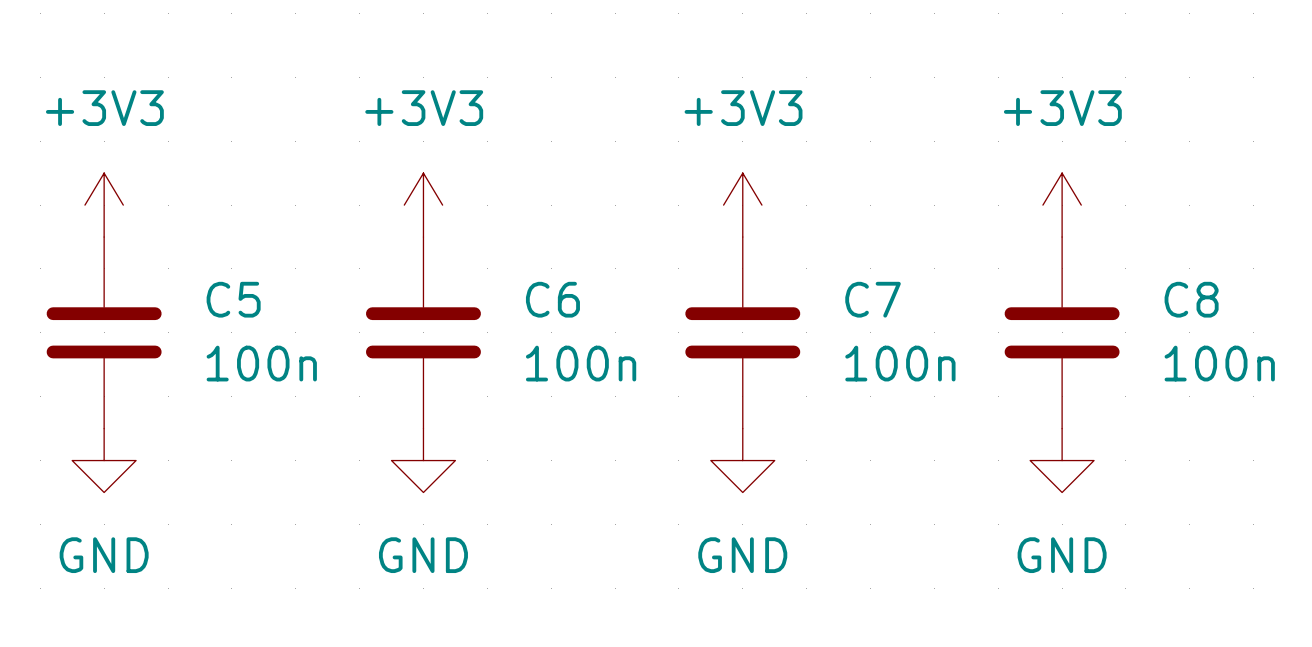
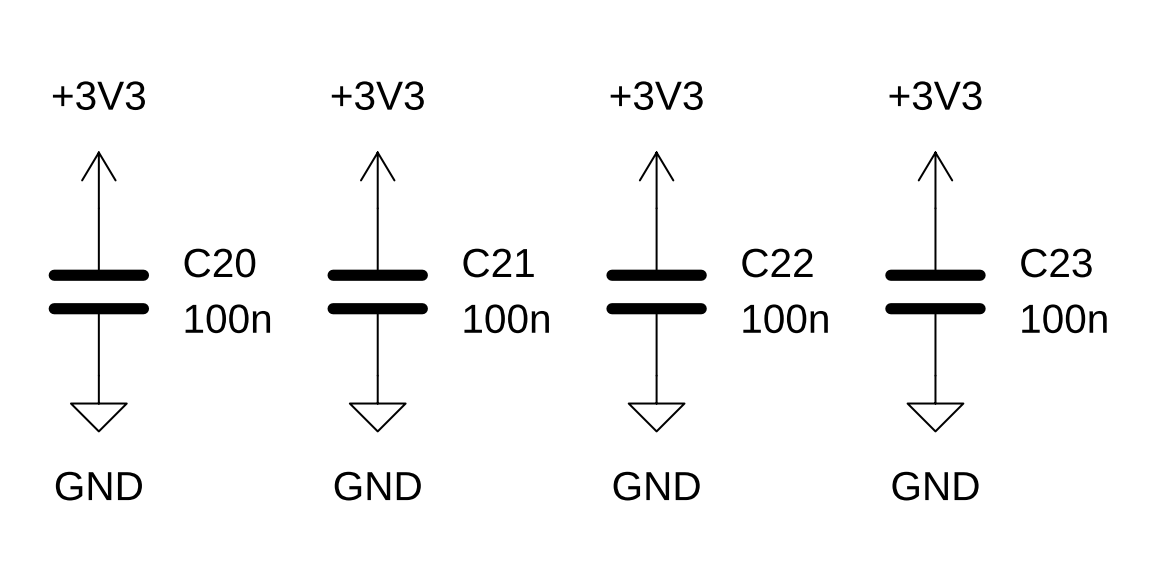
C5 name: C5 (233, 299) -> C20 (219, 263)
C6 name: C6 (552, 299) -> C21 (498, 263)
C7 name: C7 (873, 299) -> C22 (777, 263)
C8 name: C8 (1191, 299) -> C23 (1056, 263)

